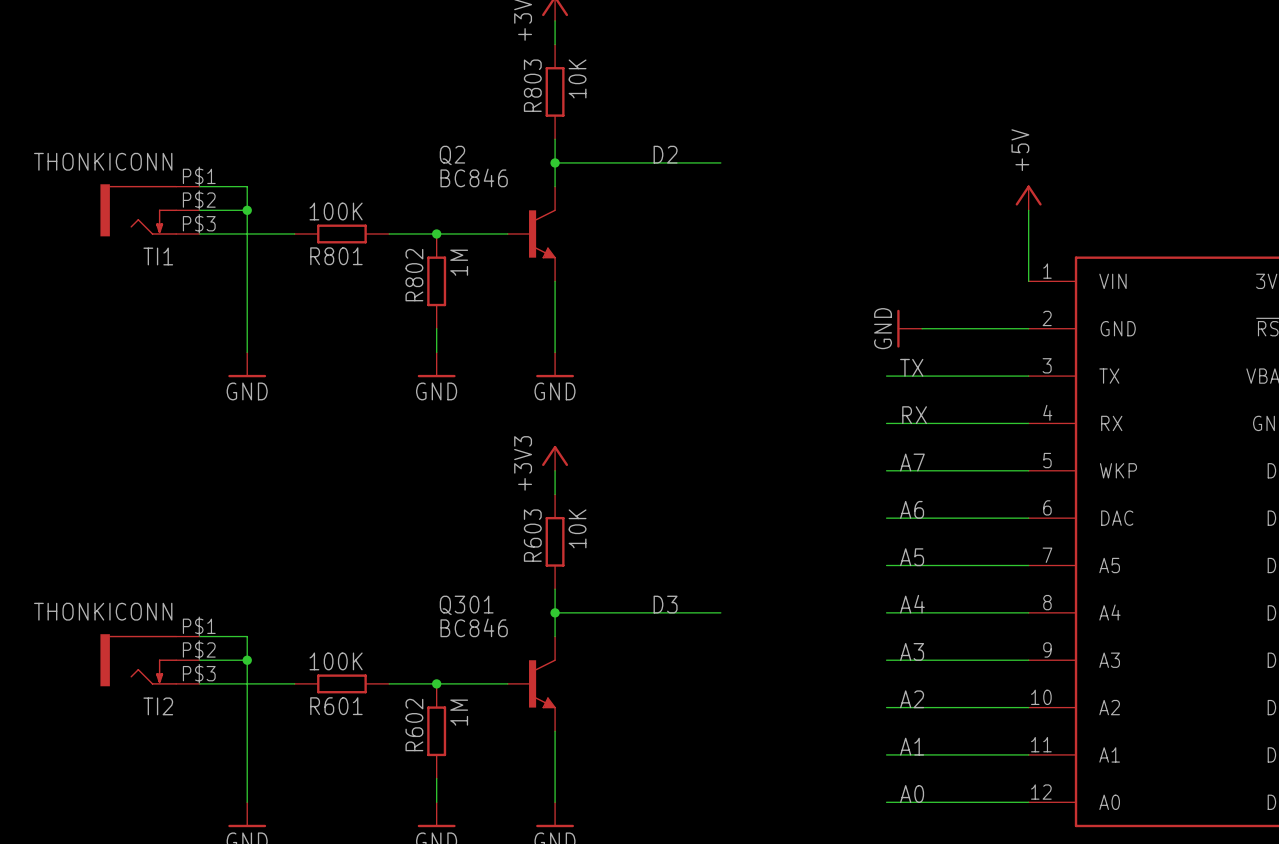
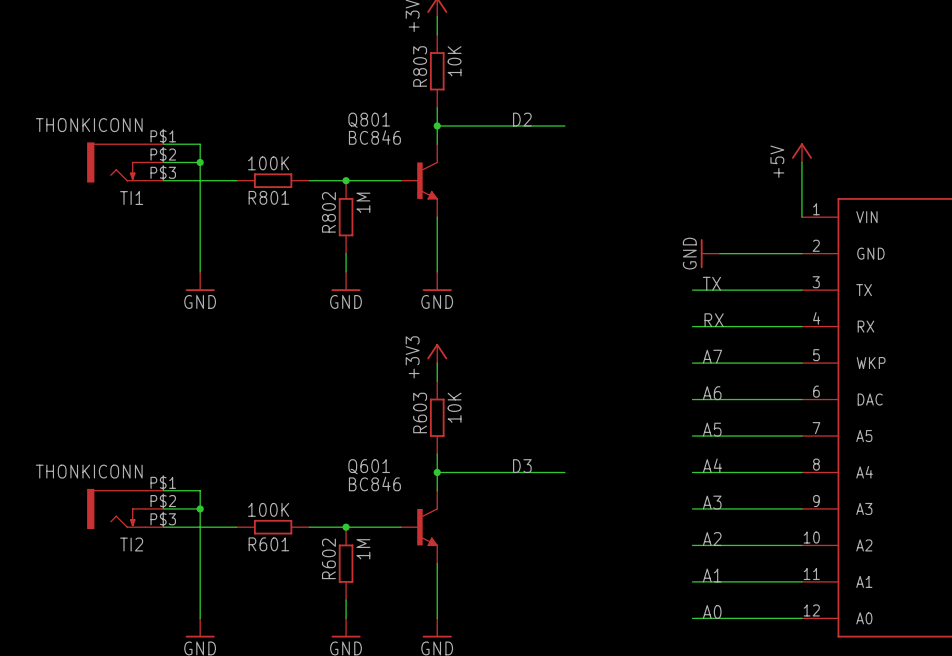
power symbol text position: +5V (1020, 150) -> +5V (777, 161)
Q2 name: Q2 (452, 155) -> Q801 (369, 120)
Q301 name: Q301 (466, 605) -> Q601 (369, 466)

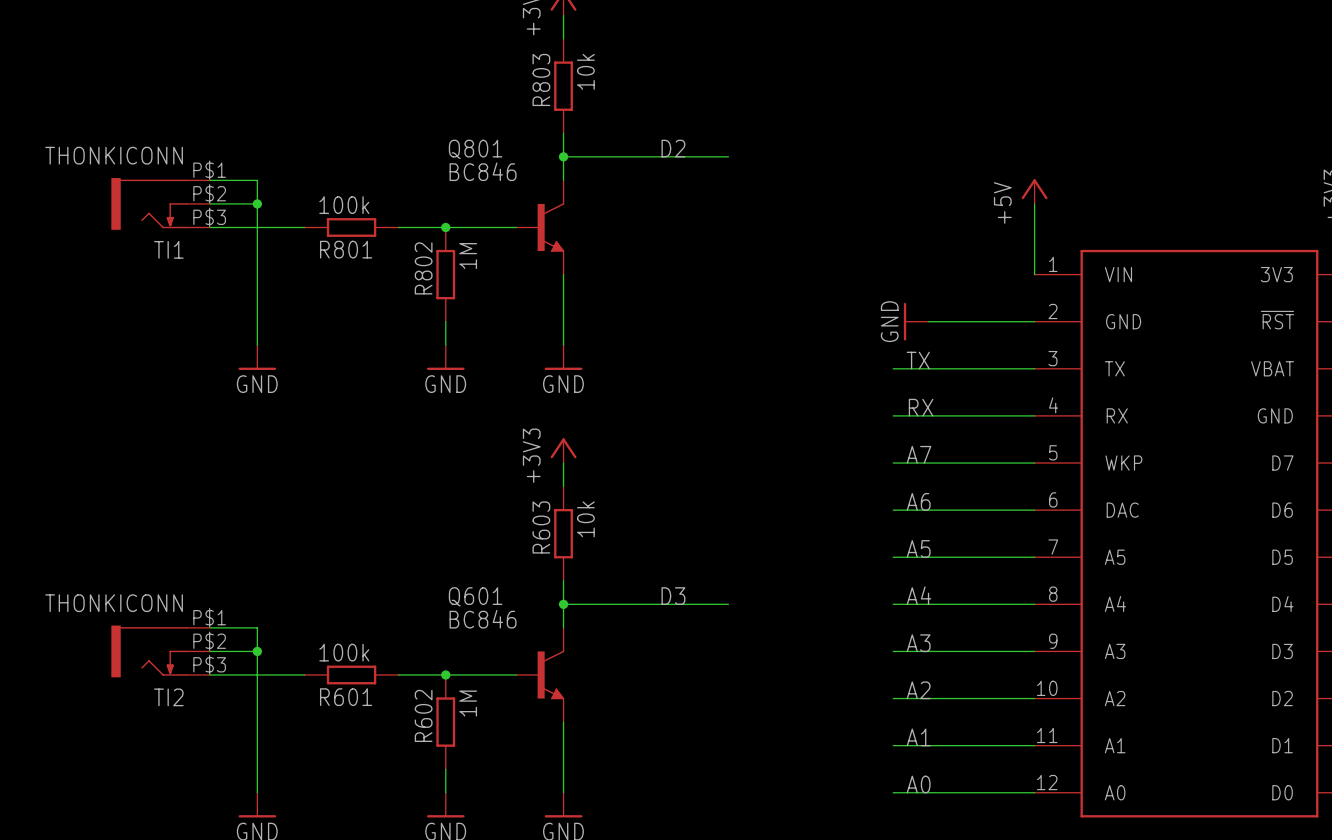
R803 value: 10K (454, 61) -> 10k (585, 71)
R801 value: 100K (268, 163) -> 100k (344, 205)
R603 value: 10K (454, 407) -> 10k (585, 519)
R601 value: 100K (268, 509) -> 100k (344, 652)

